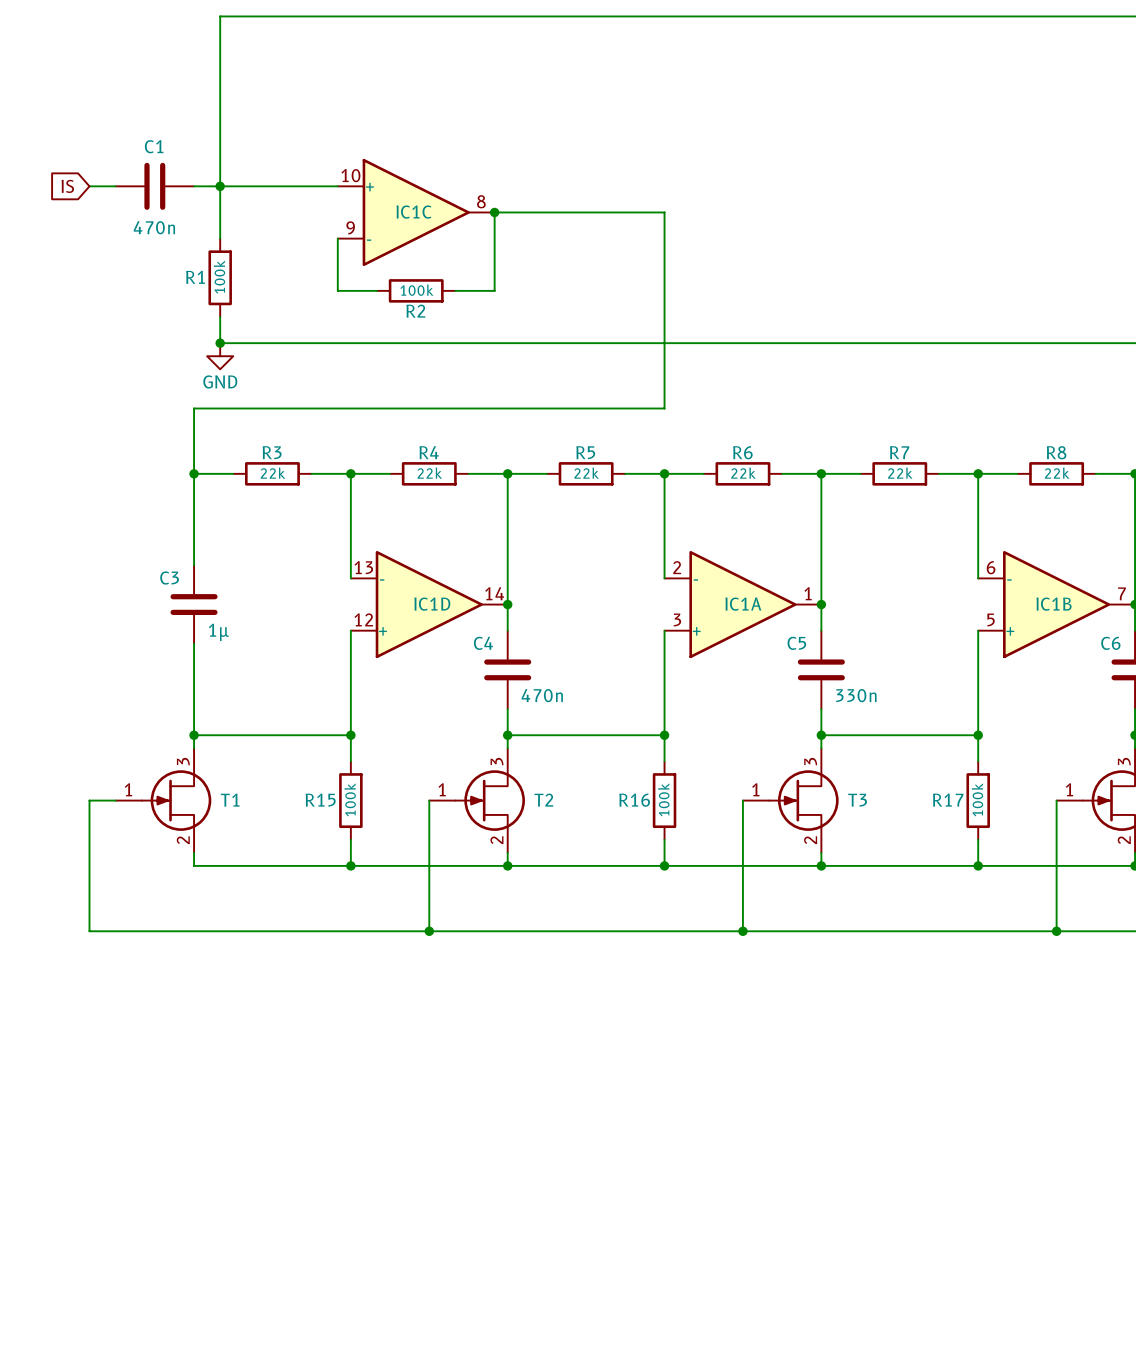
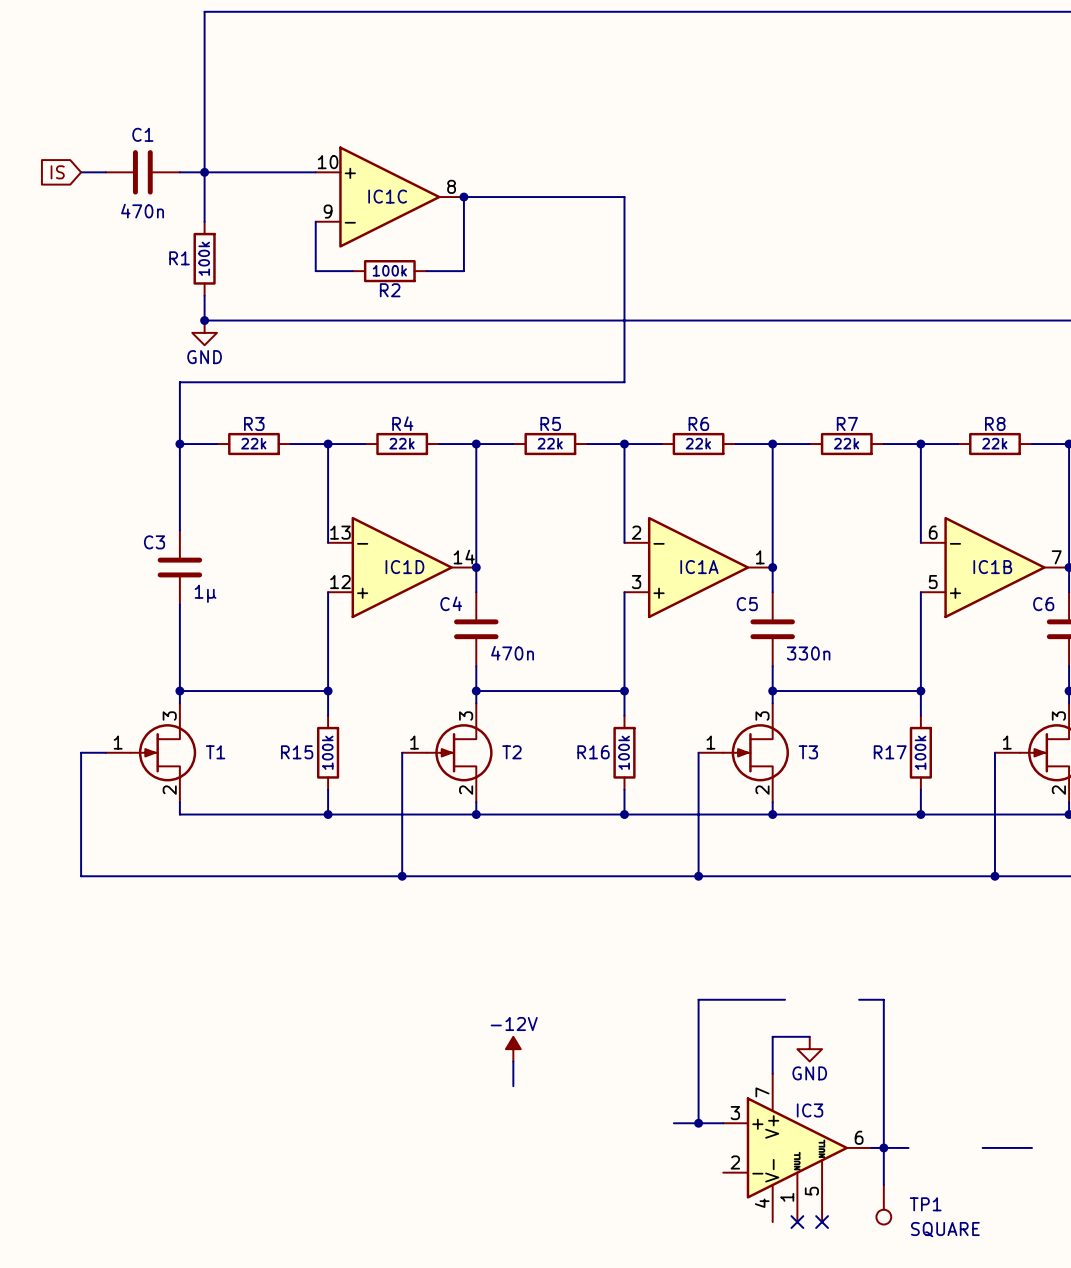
wire: none -> (785, 999) (698, 999) (698, 1123)
wire: none -> (859, 999) (883, 999) (883, 1185)
wire: none -> (809, 1036) (772, 1036) (772, 1073)
power symbol: none -> -12V (513, 1049)
power symbol: none -> GND (809, 1049)
wire: none -> (513, 1061) (513, 1086)
wire: none -> (673, 1123) (723, 1123)
junction: none -> (698, 1123)
IC3: none -> (797, 1147)
wire: none -> (871, 1147) (908, 1147)
junction: none -> (883, 1147)
wire: none -> (982, 1147) (1032, 1147)
TP1: none -> SQUARE (883, 1204)
no-connect mark: none -> (797, 1222)
no-connect mark: none -> (822, 1222)

